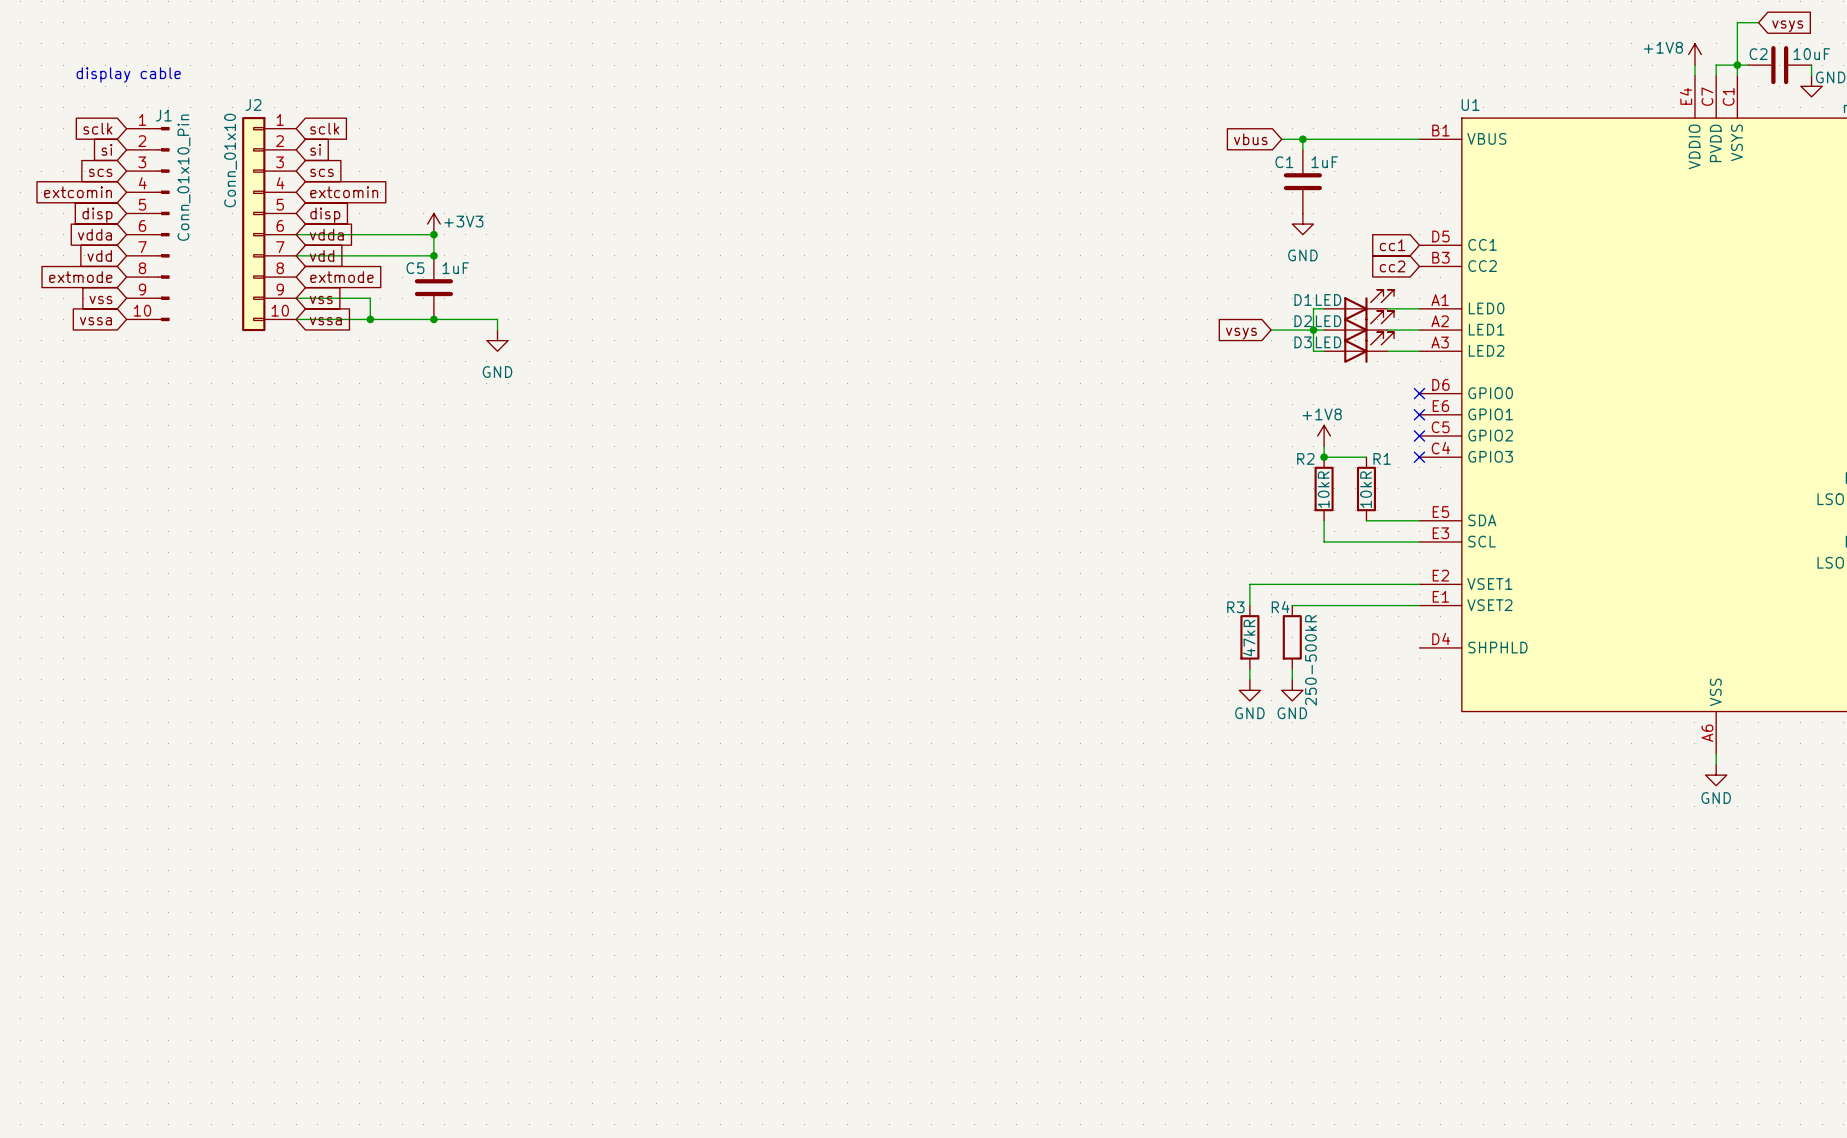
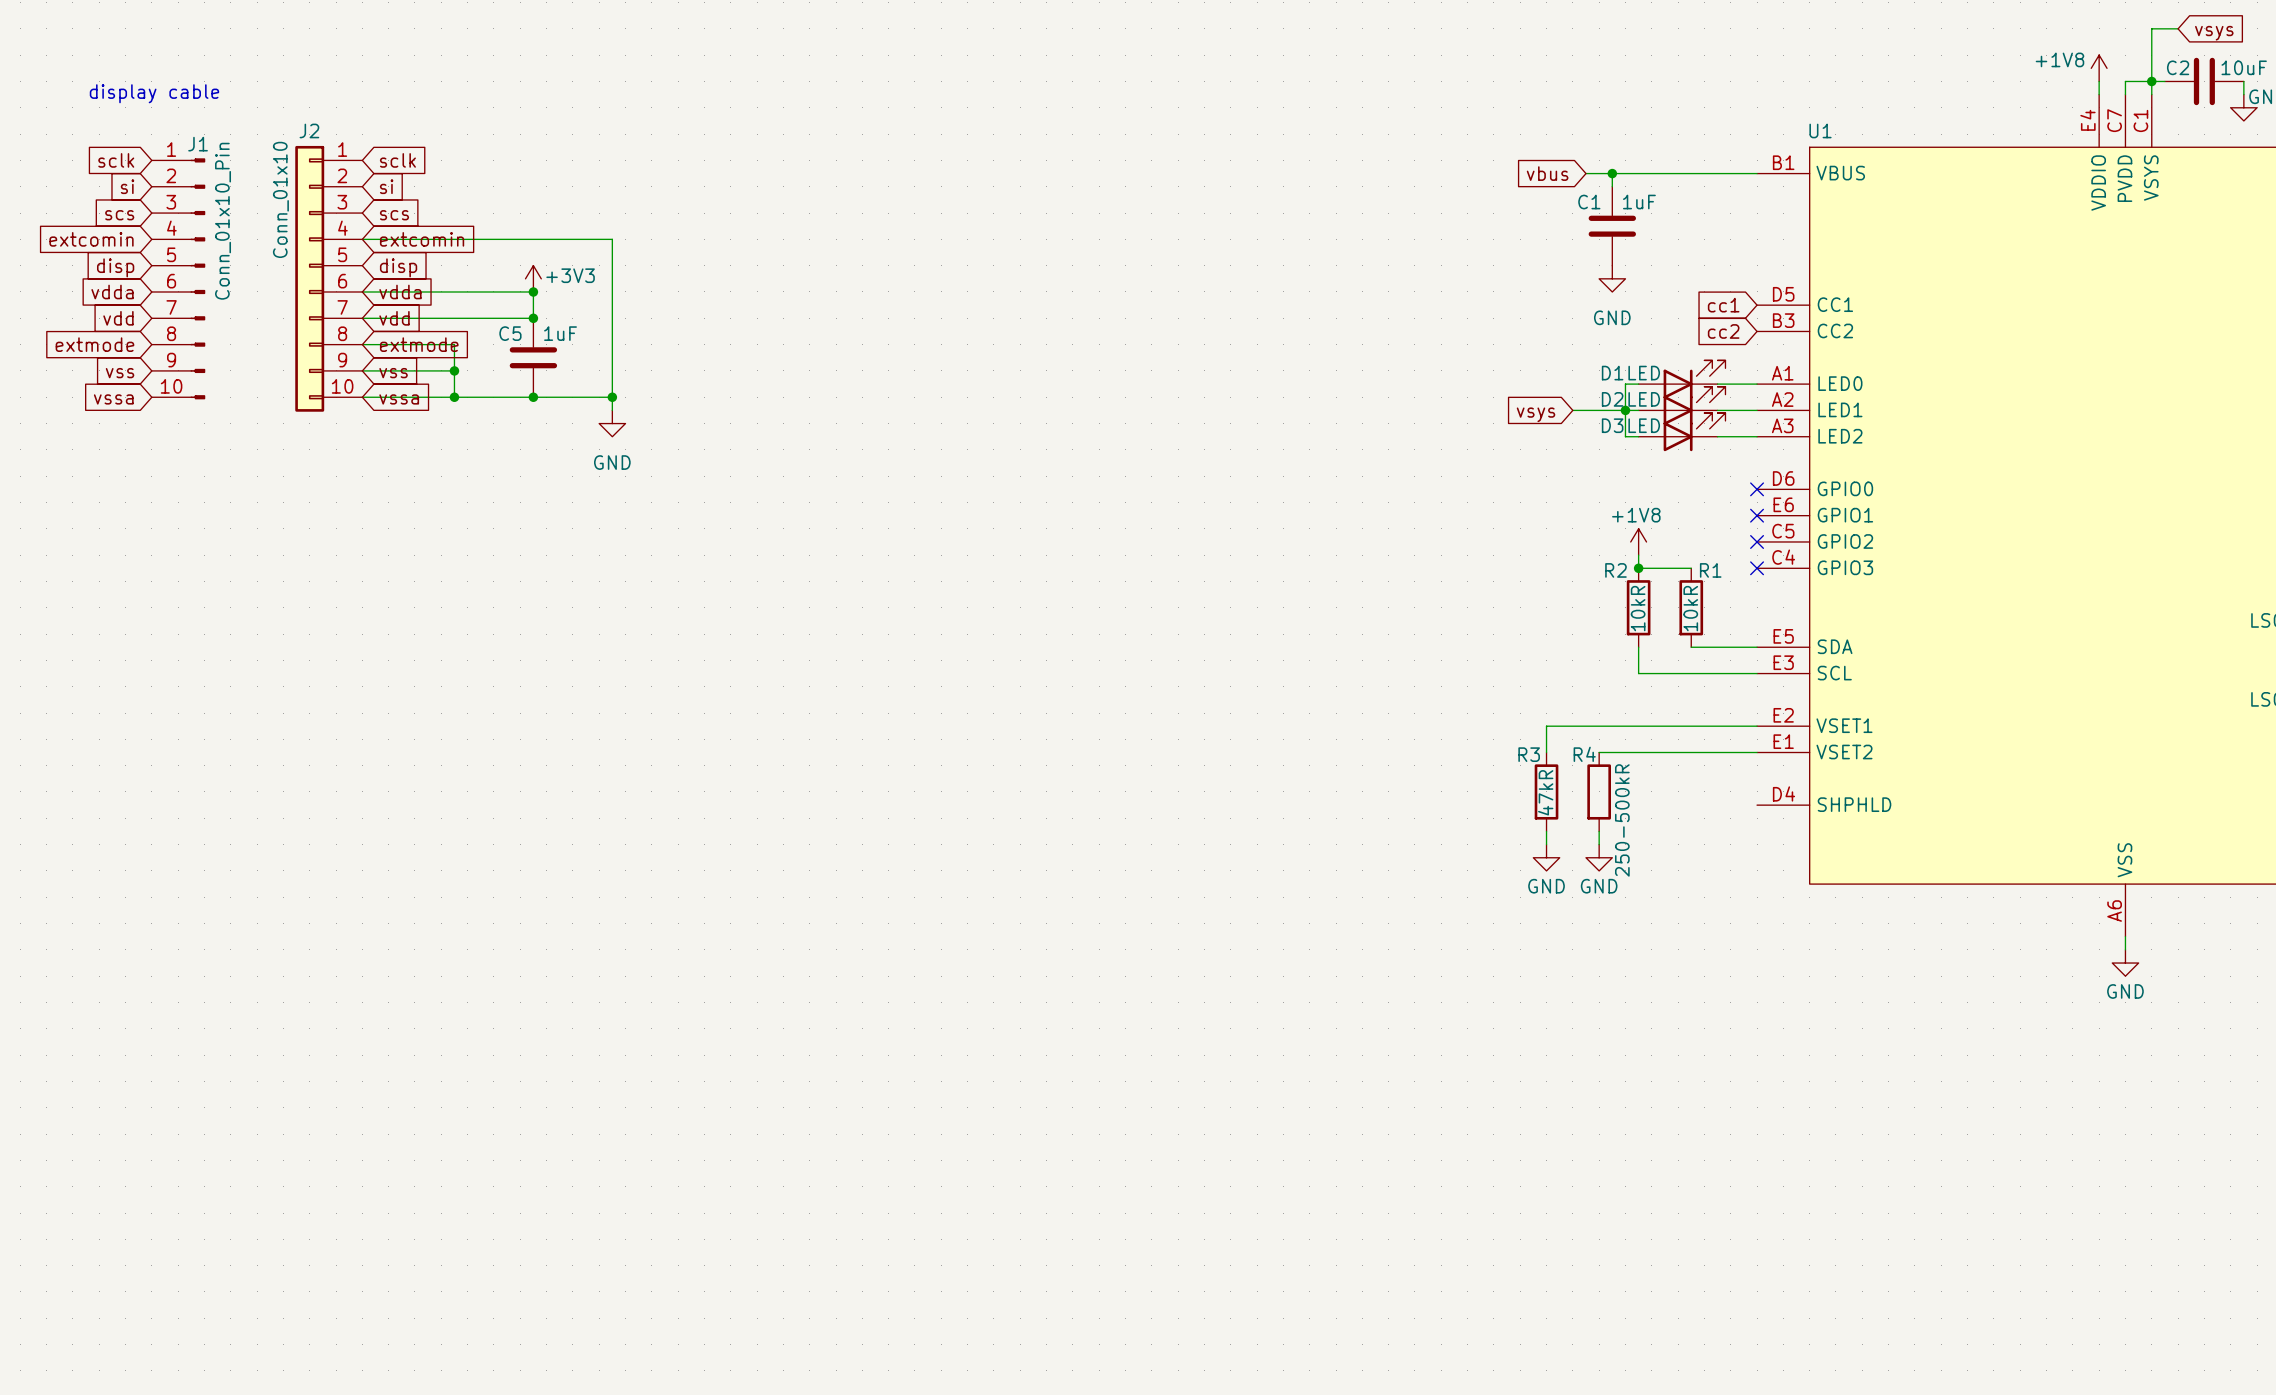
wire: none -> (362, 239) (612, 239) (612, 397)
wire: none -> (362, 344) (454, 344) (454, 370)
junction: none -> (454, 370)
junction: none -> (612, 397)

